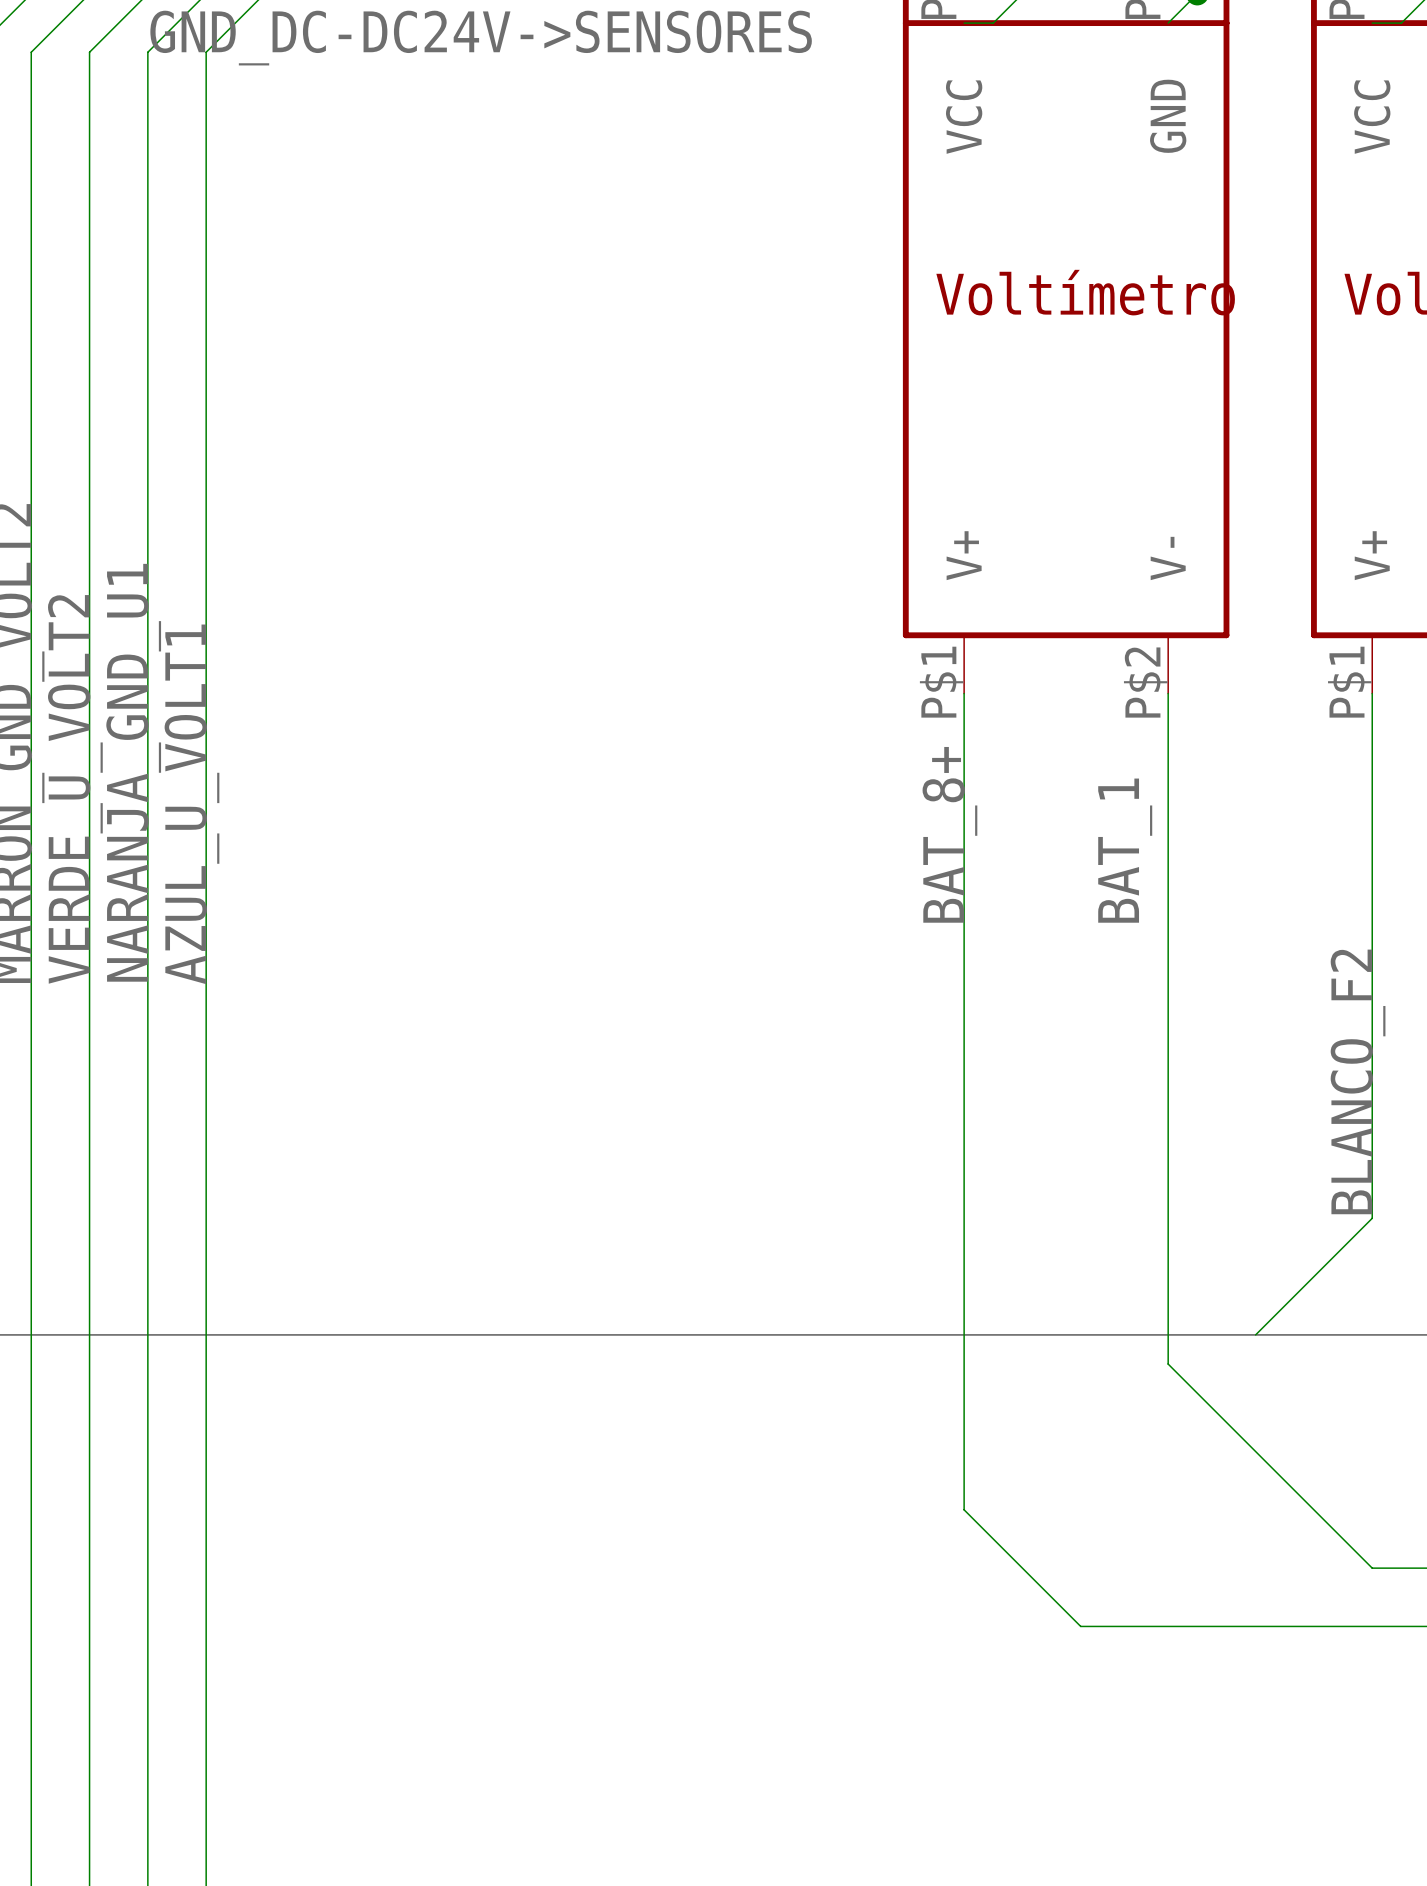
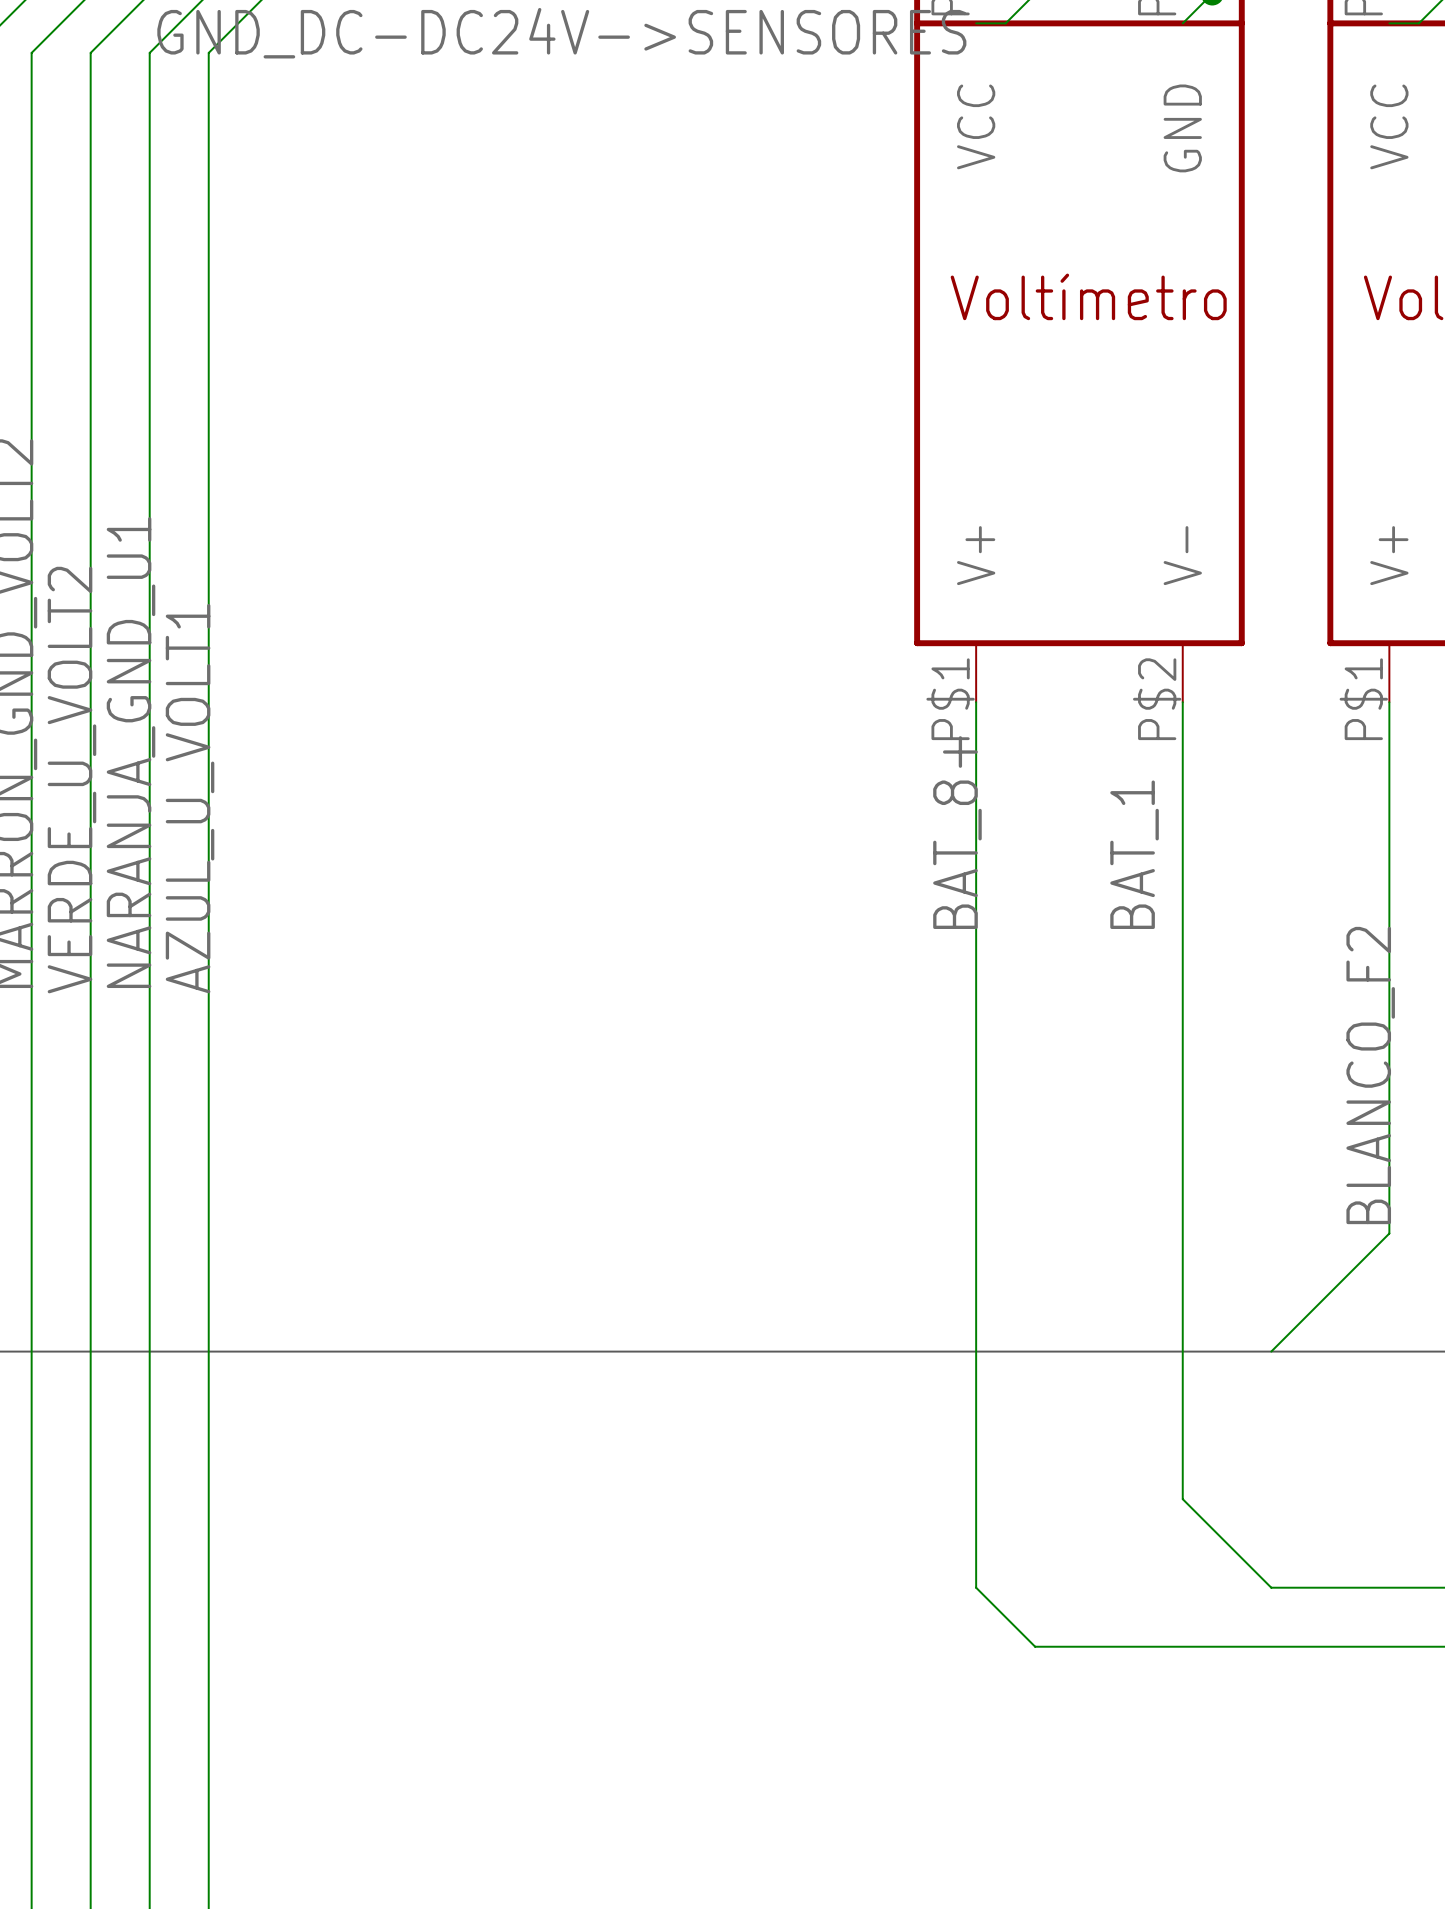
wire: (1168, 1364) (1372, 1568) -> (1182, 1381) (1182, 1499) (1271, 1587) (1389, 1587)
wire: (964, 1509) (1080, 1626) -> (976, 1528) (976, 1587) (1035, 1646) (1094, 1646)

